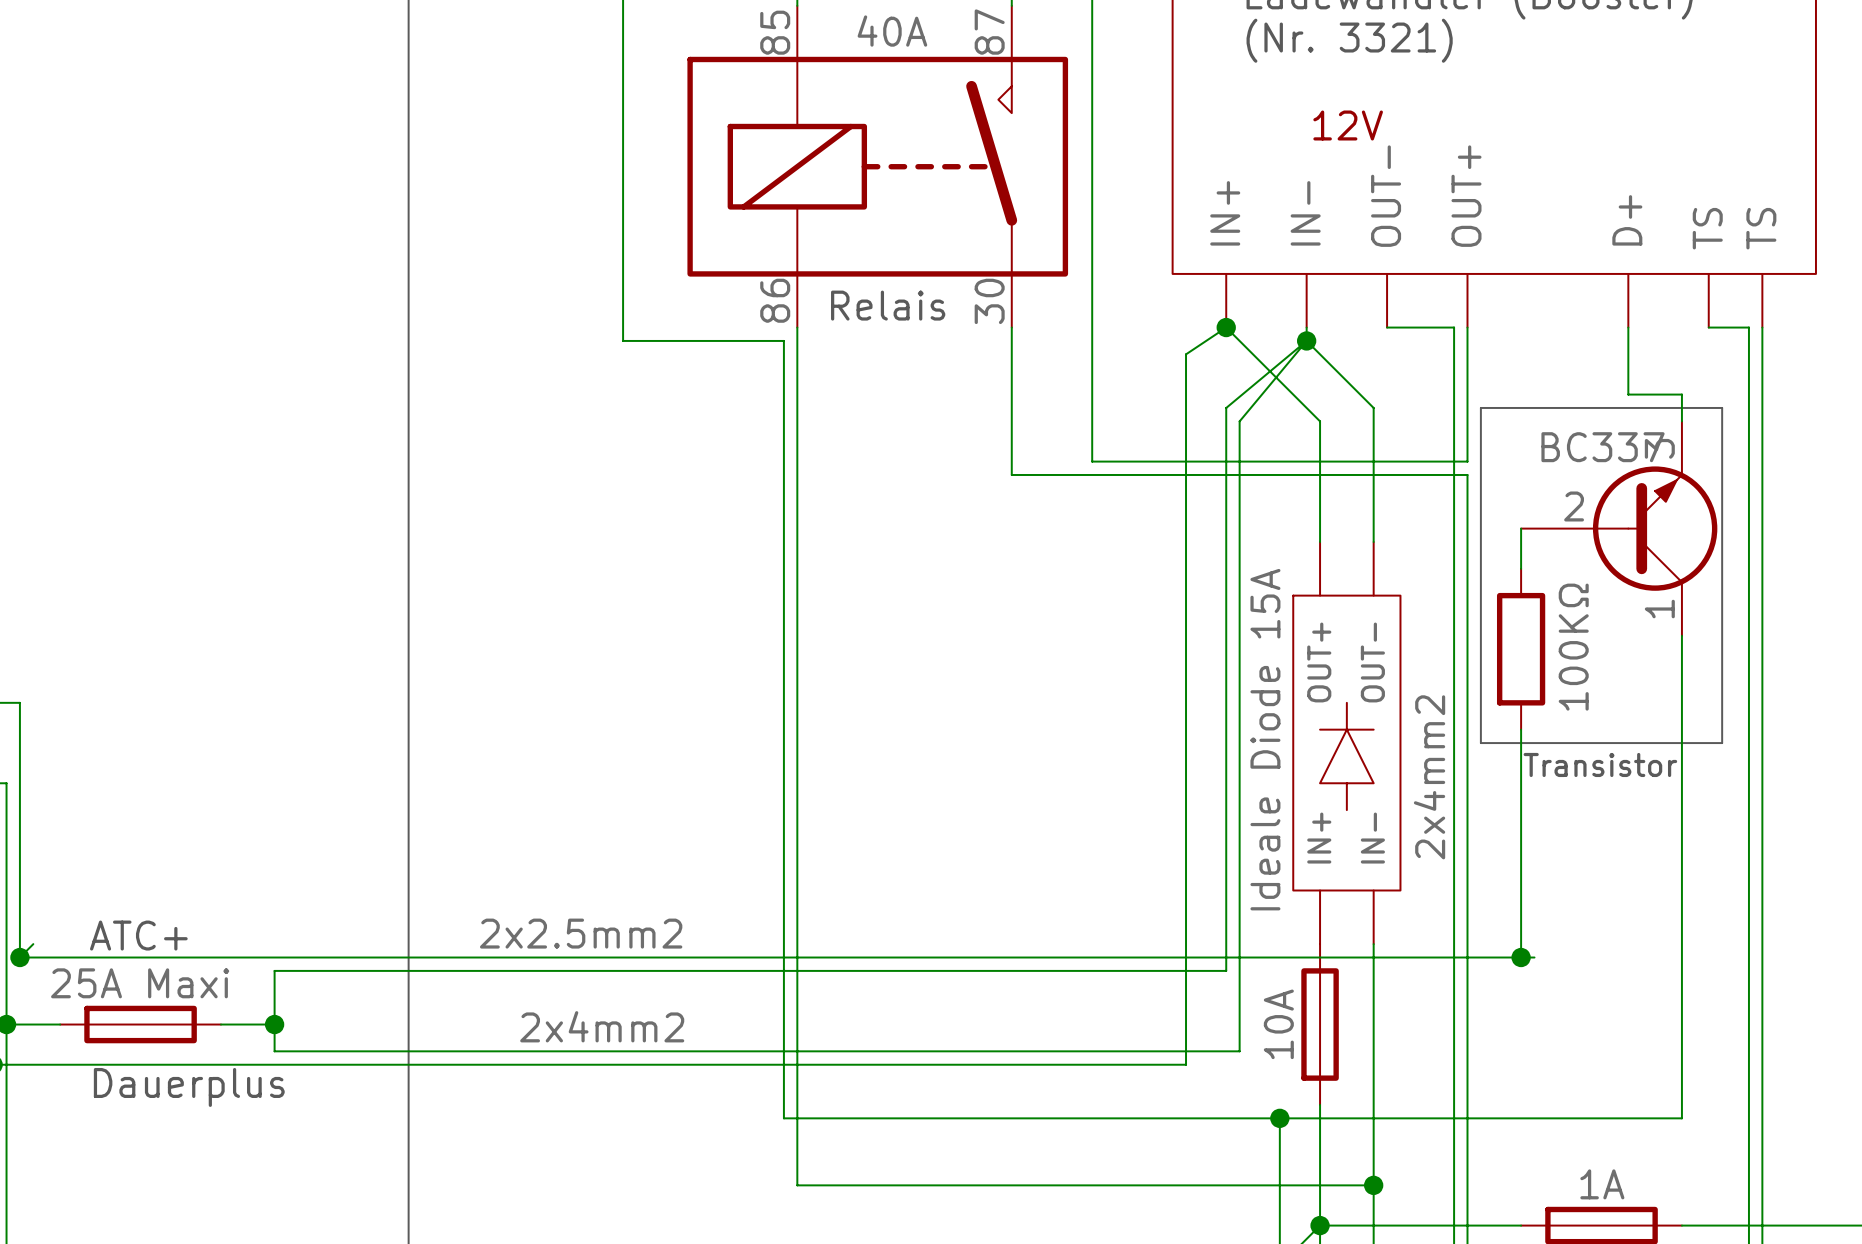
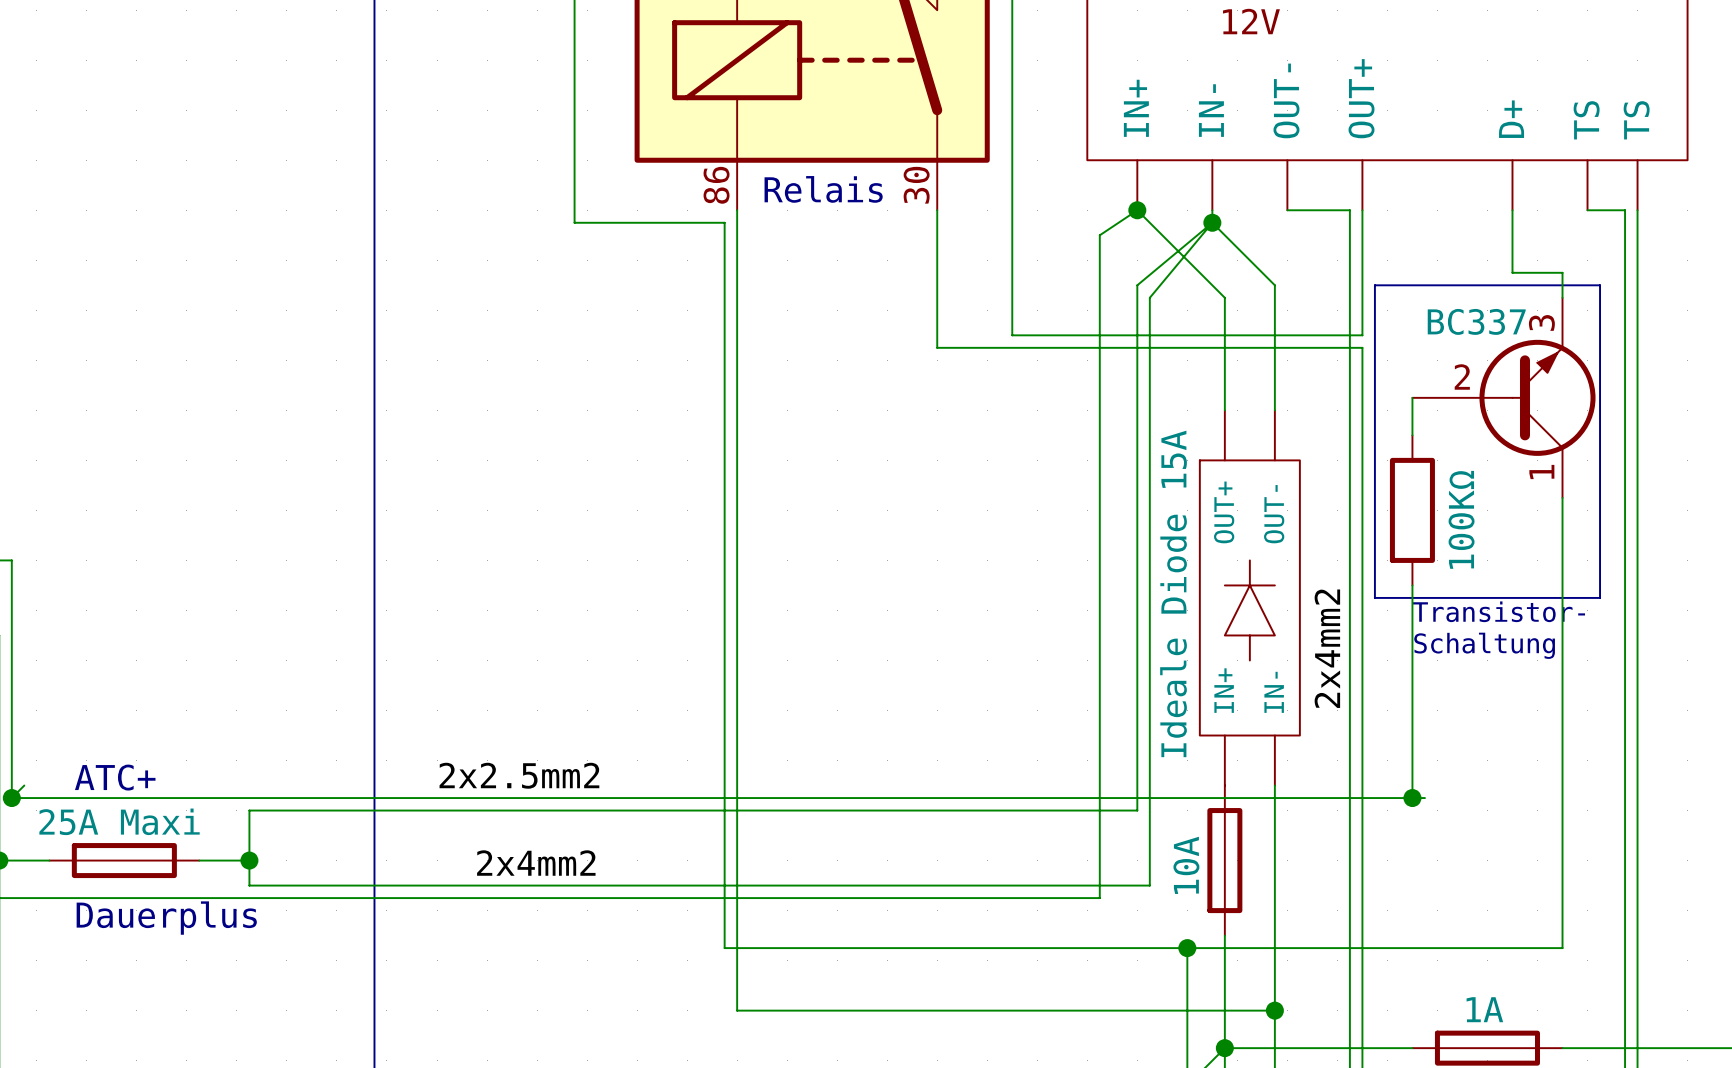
text: Transistor (1600, 764) -> Transistor- (1499, 611)
text: none -> Schaltung (1484, 645)

